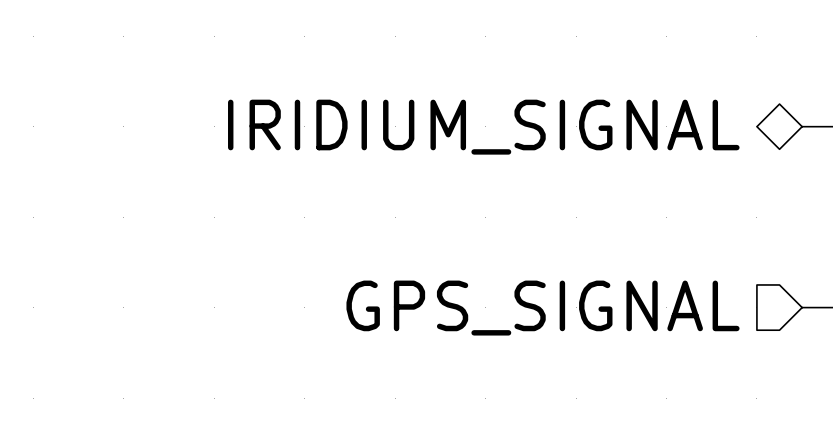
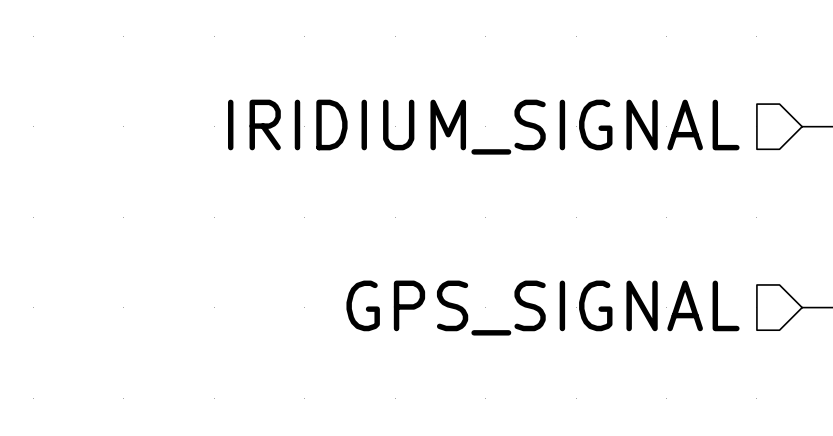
hierarchical label shape: bidirectional (483, 127) -> input (483, 127)

